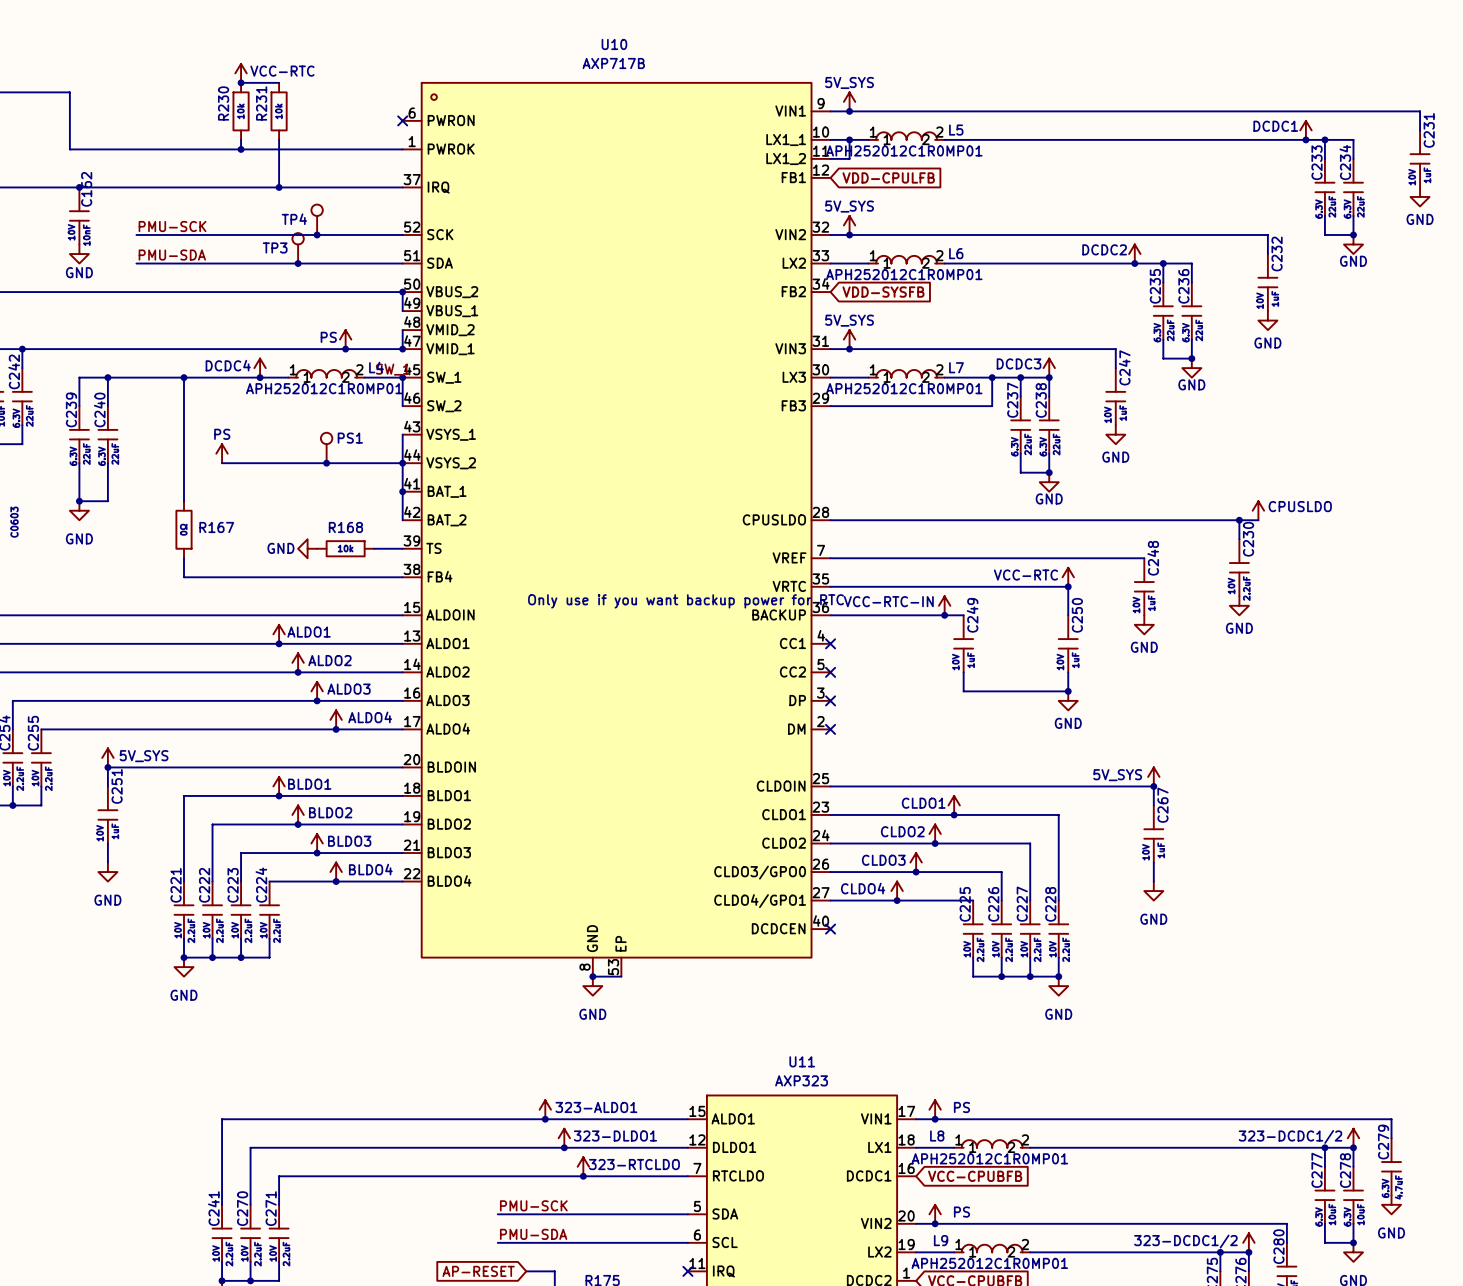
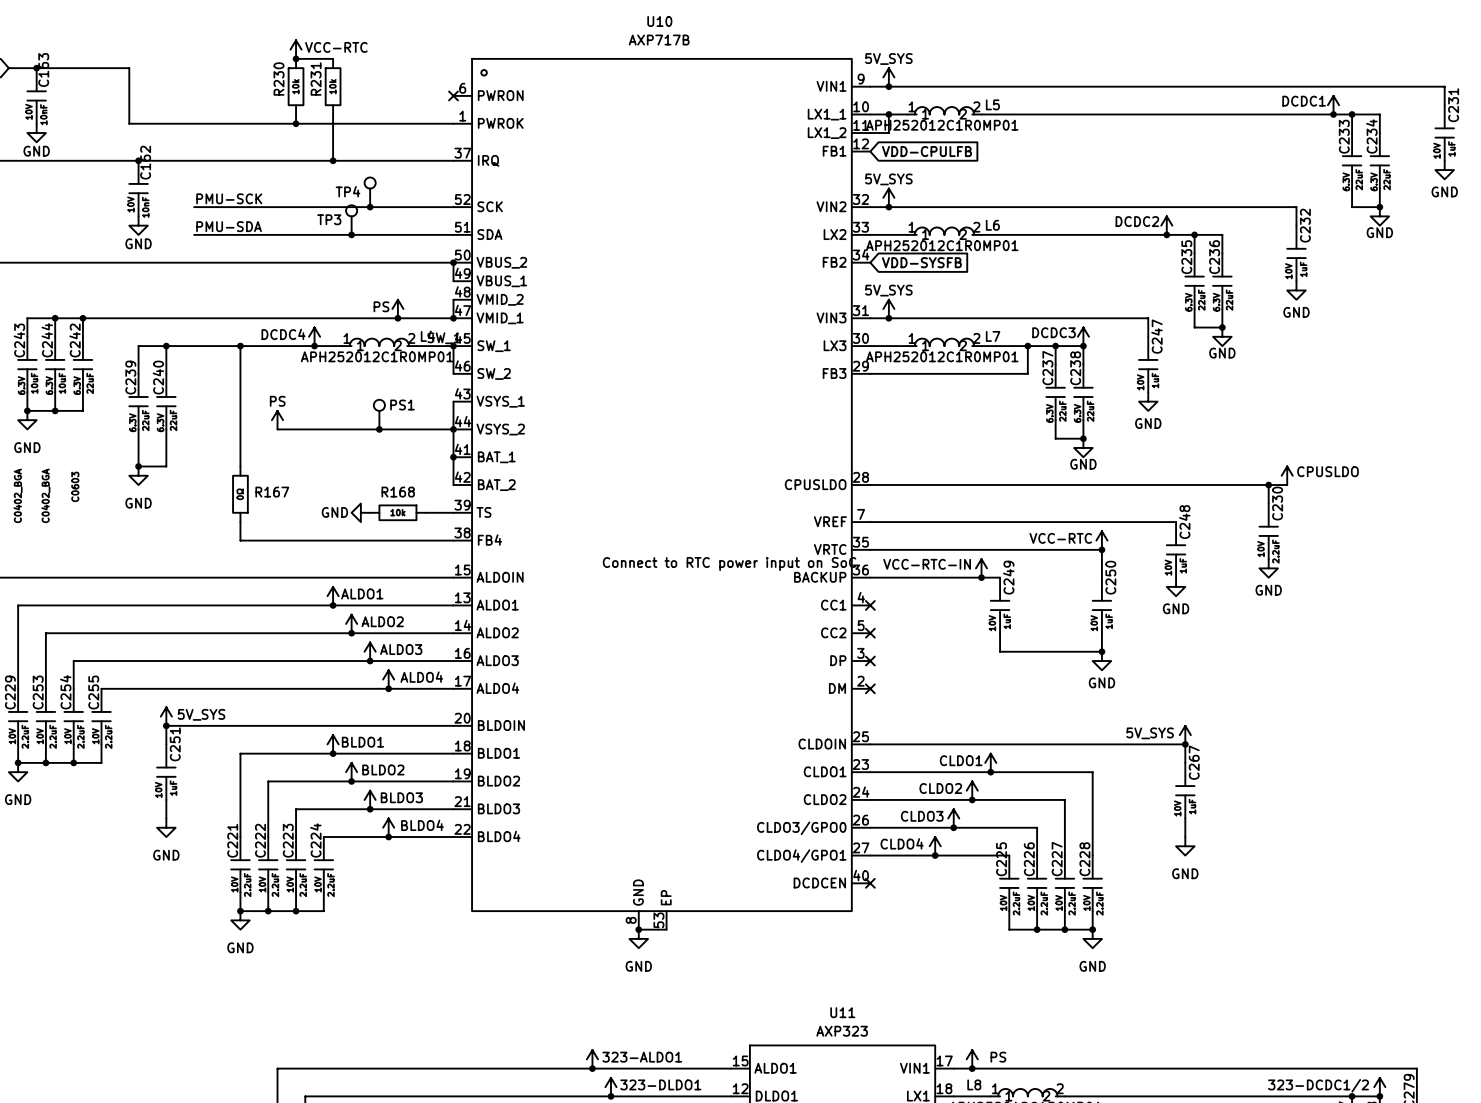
text: Only use if you want backup power for RTC (686, 601) -> Connect to RTC power input on SoC (729, 564)

